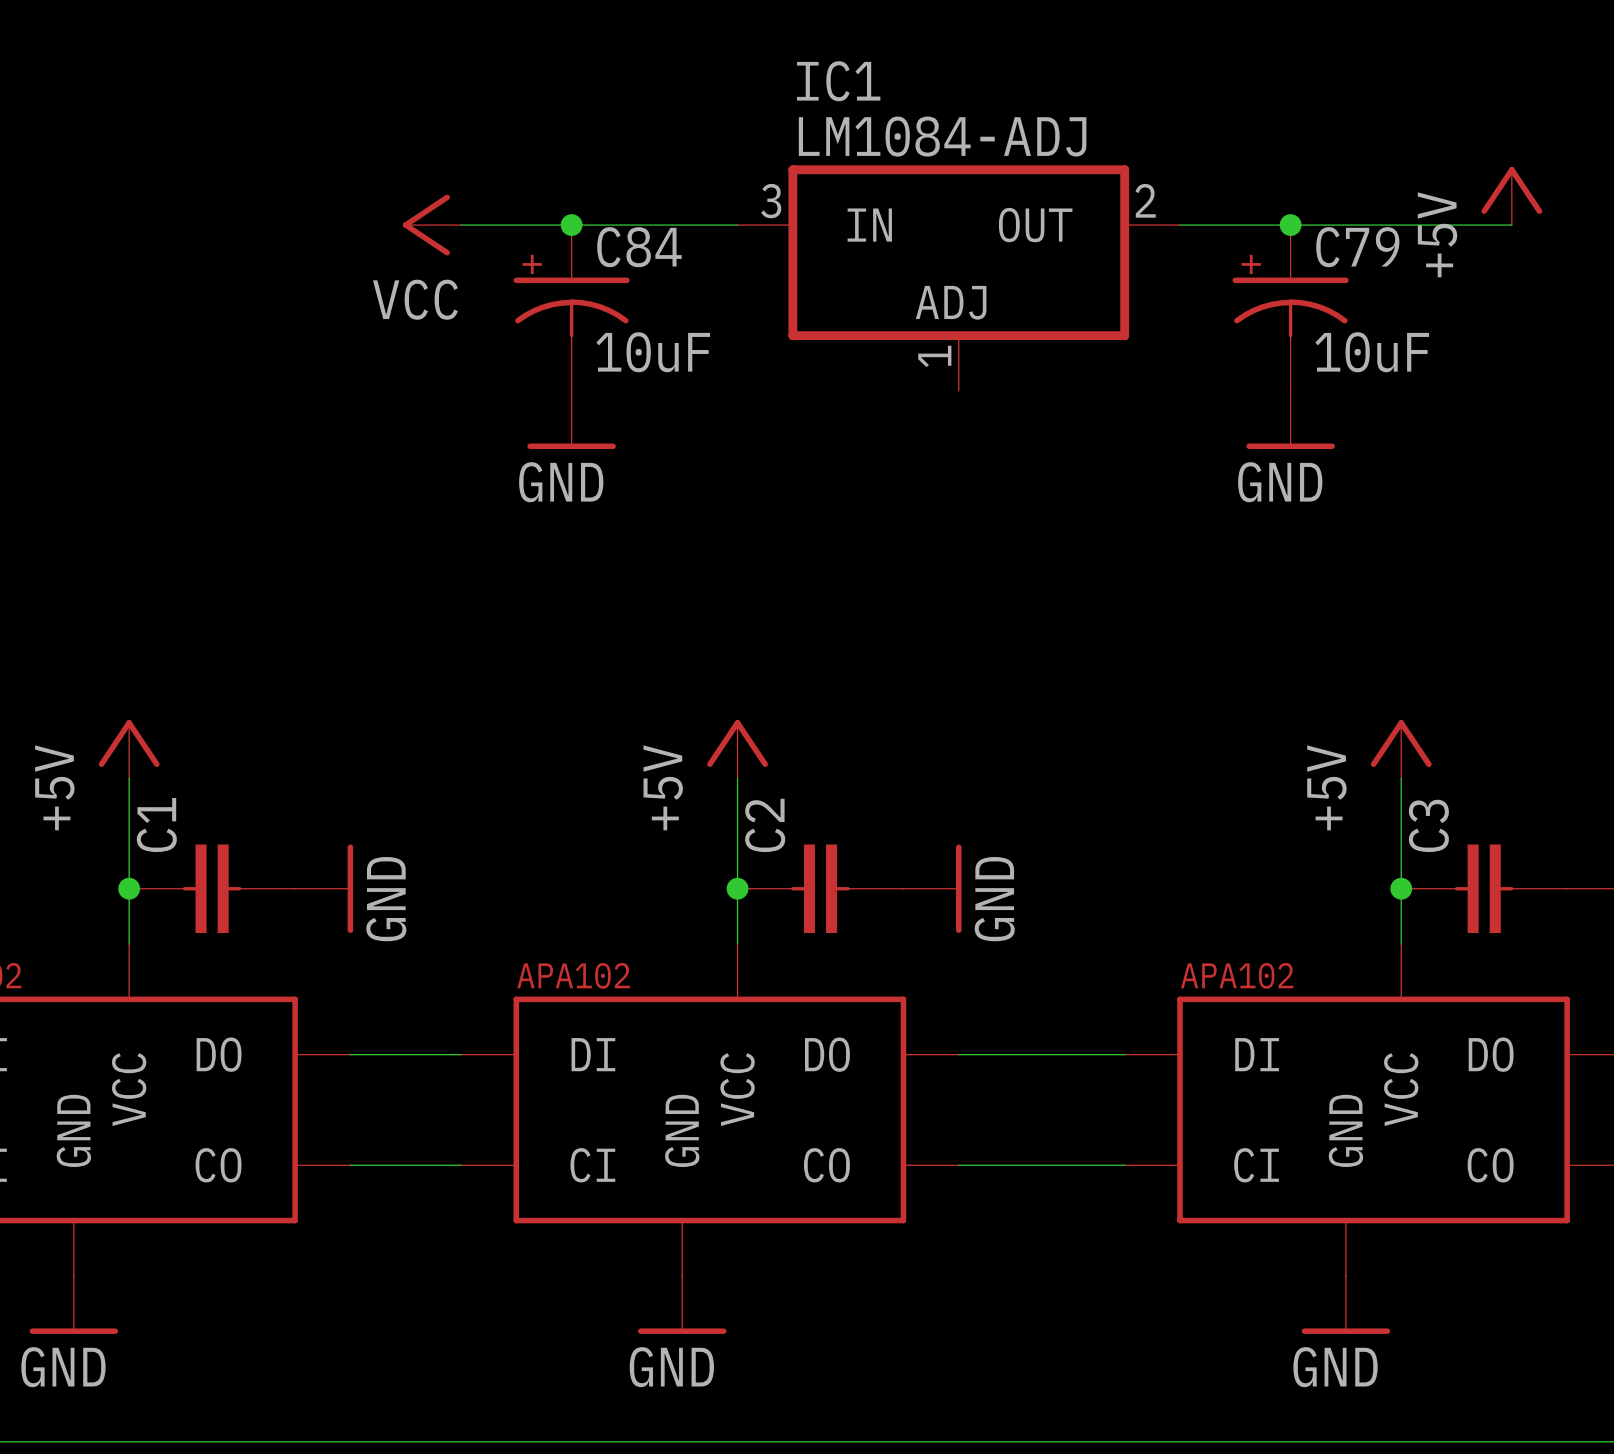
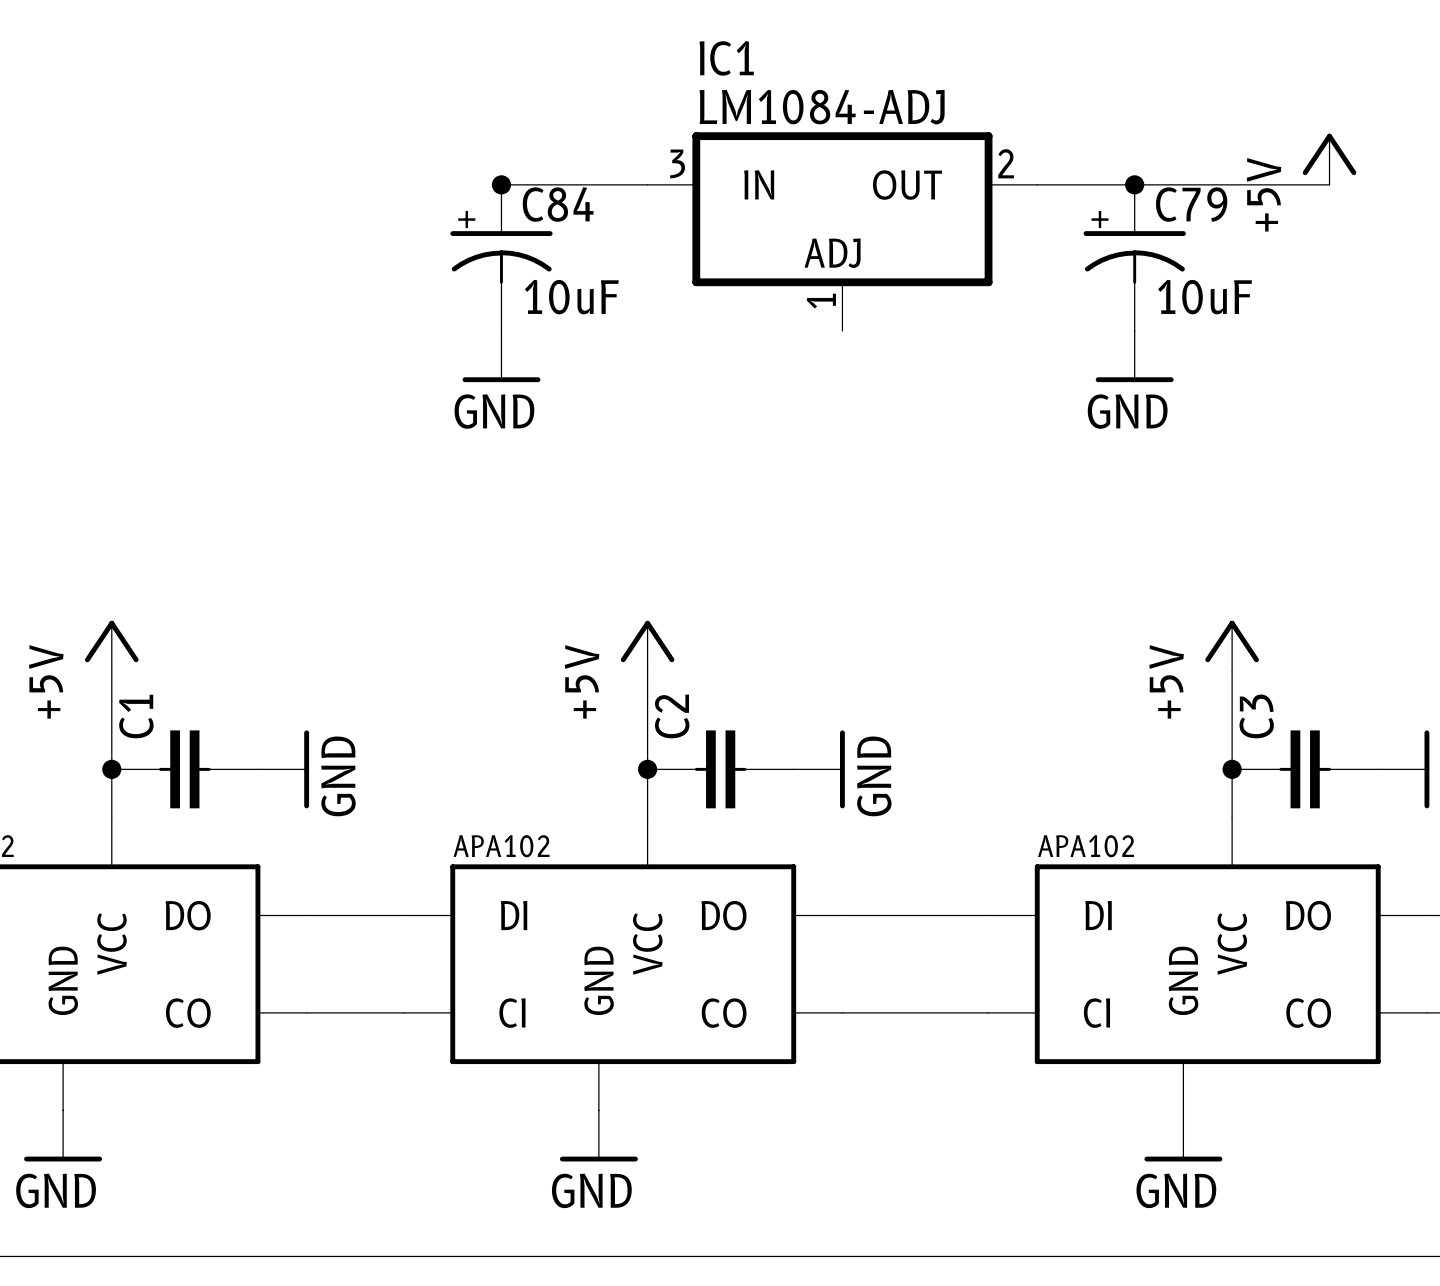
power symbol: VCC (431, 225) -> none
wire: (461, 225) (571, 225) -> none

